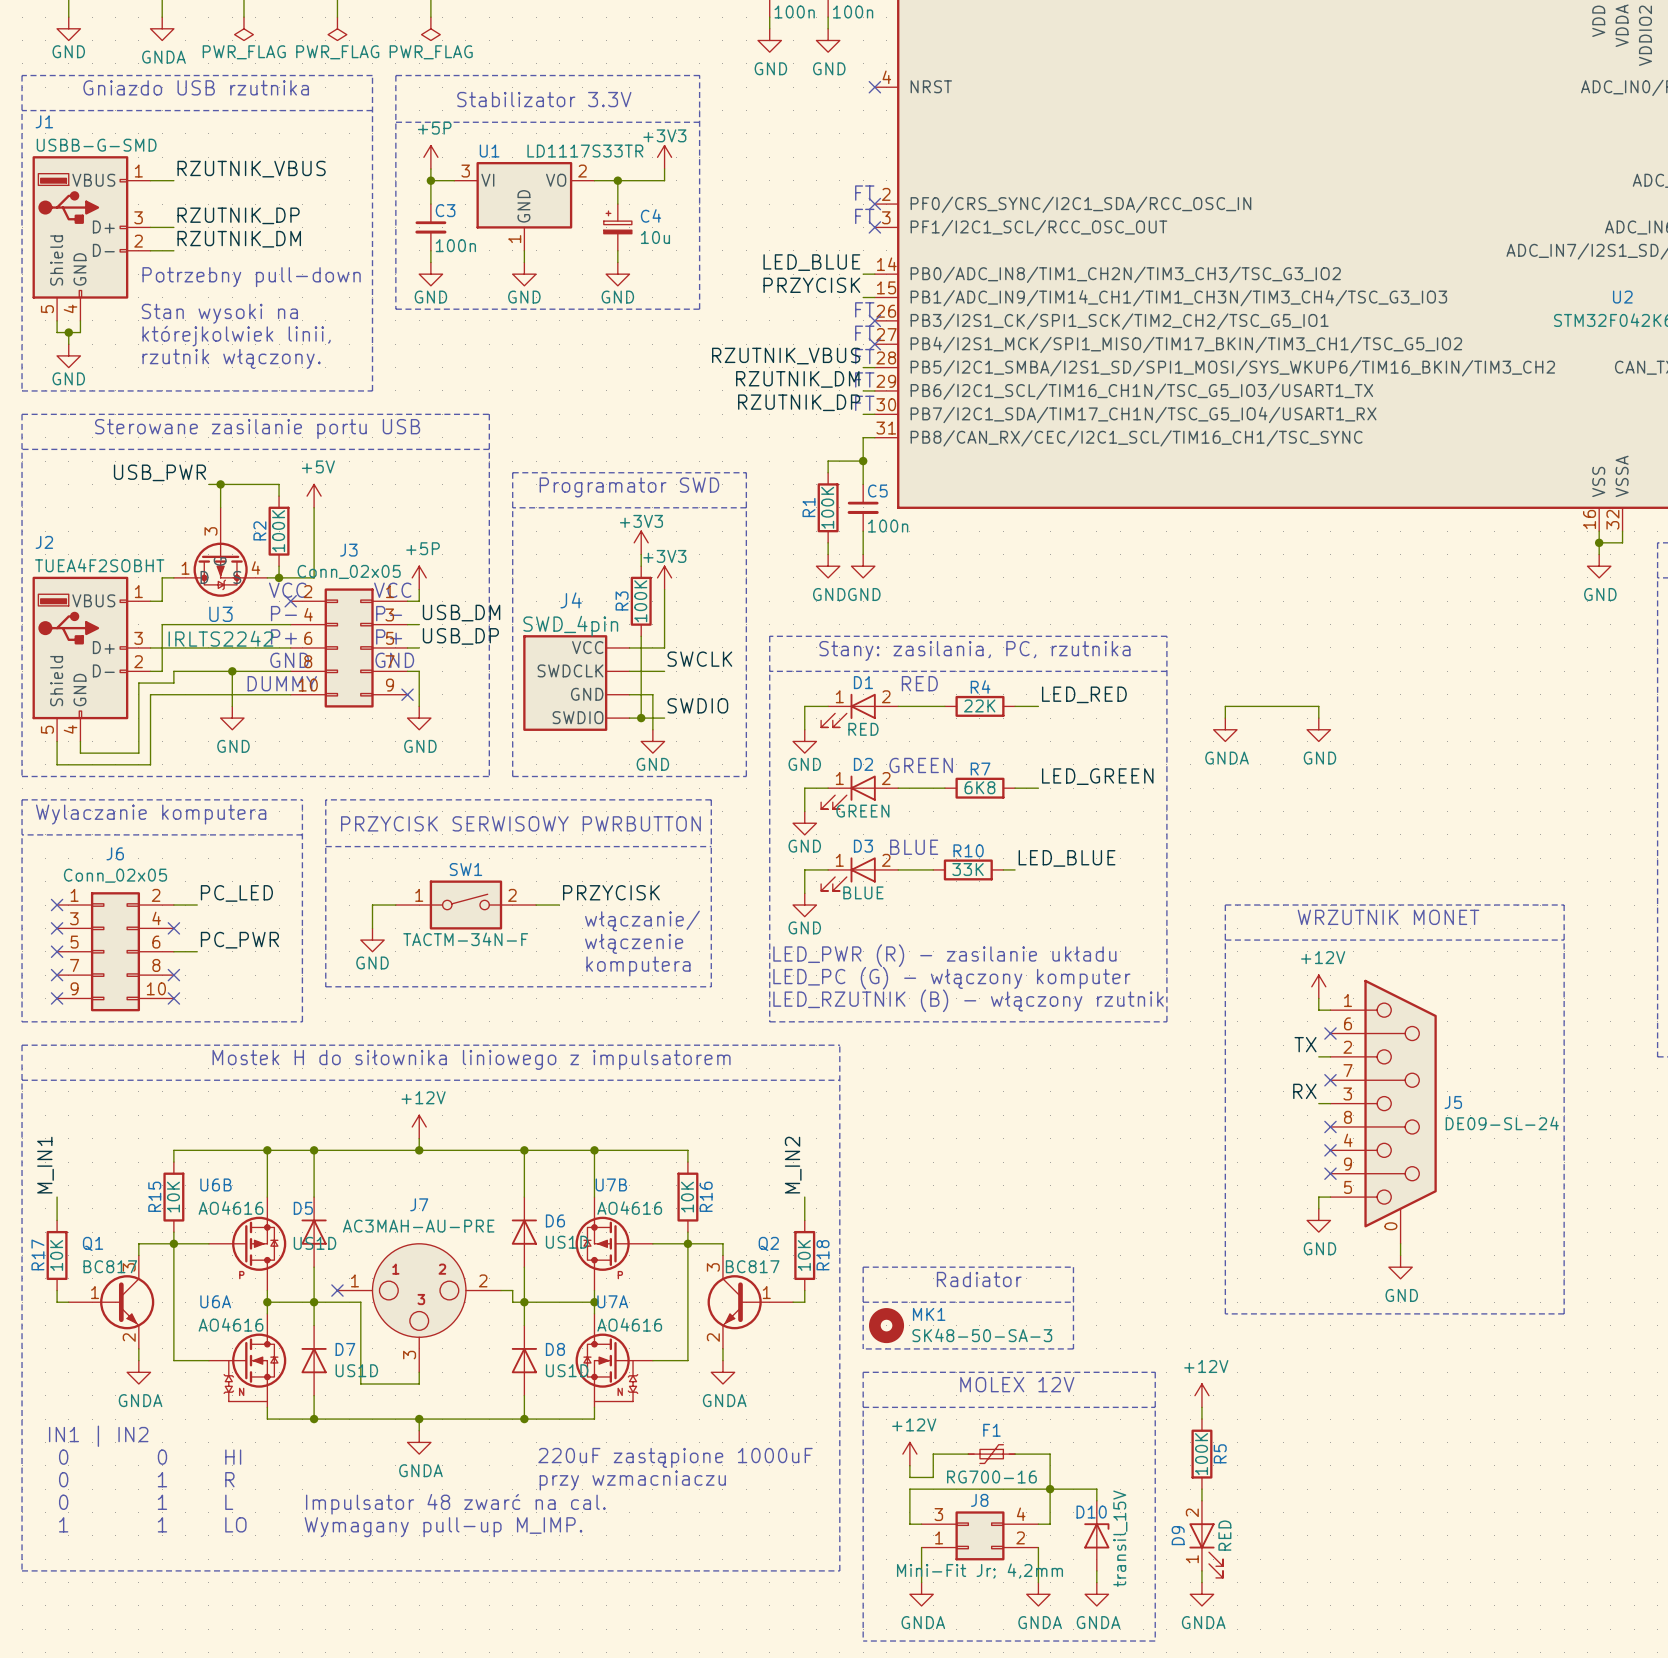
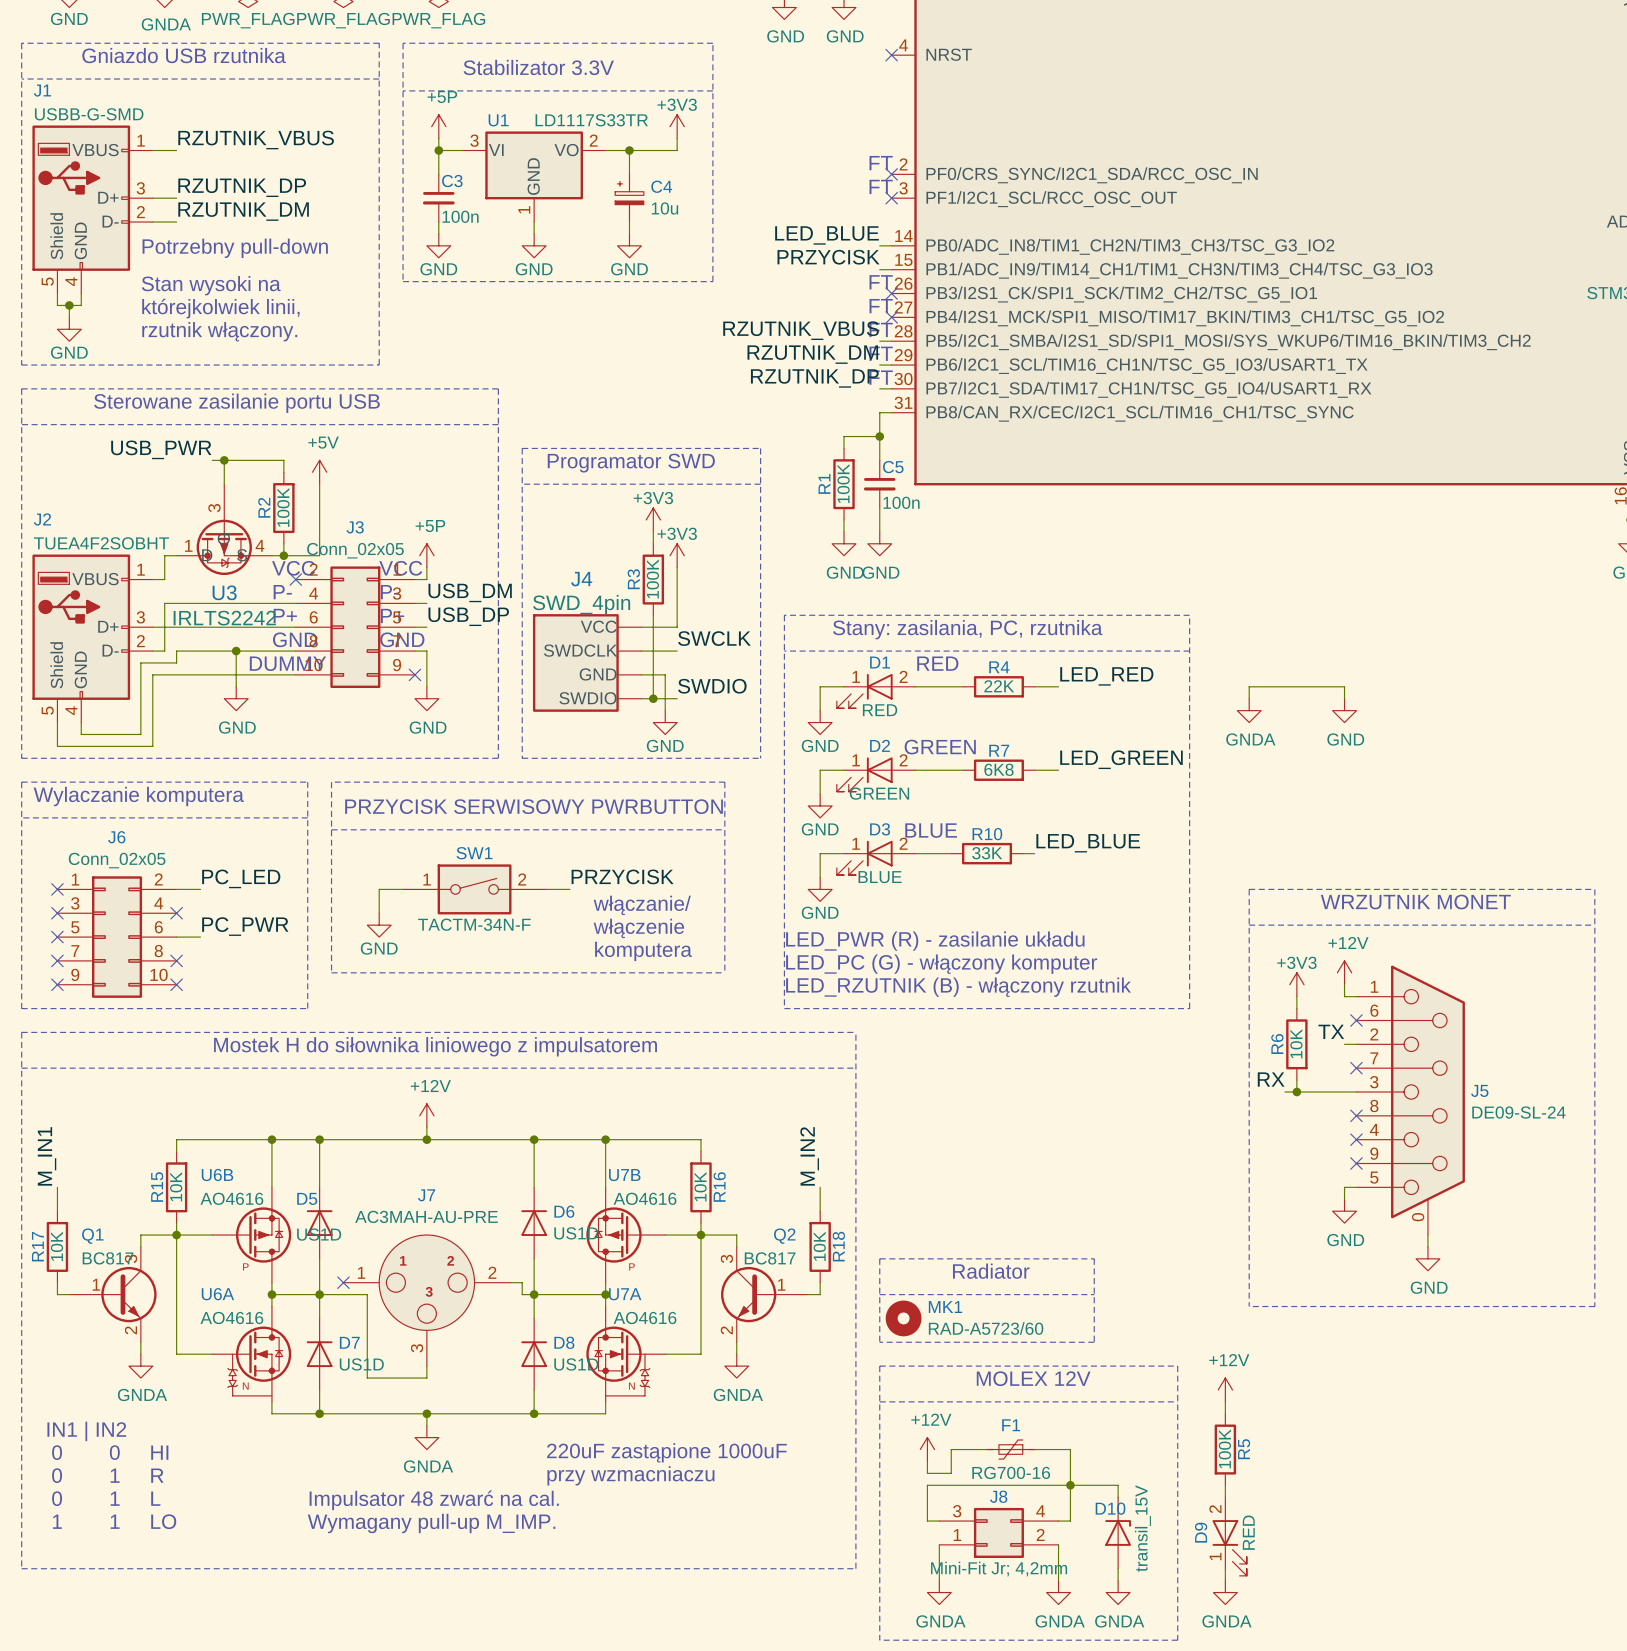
power symbol: none -> +3V3 (1296, 984)
wire: none -> (1296, 996) (1296, 1008)
R6: none -> 10K (1296, 1044)
wire: none -> (1296, 1080) (1296, 1092)
label position: RX (1304, 1091) -> RX (1271, 1079)
wire: none -> (1284, 1092) (1344, 1092)
junction: none -> (1296, 1092)
MK1 value: SK48-50-SA-3 (982, 1335) -> RAD-A5723/60 (986, 1328)

